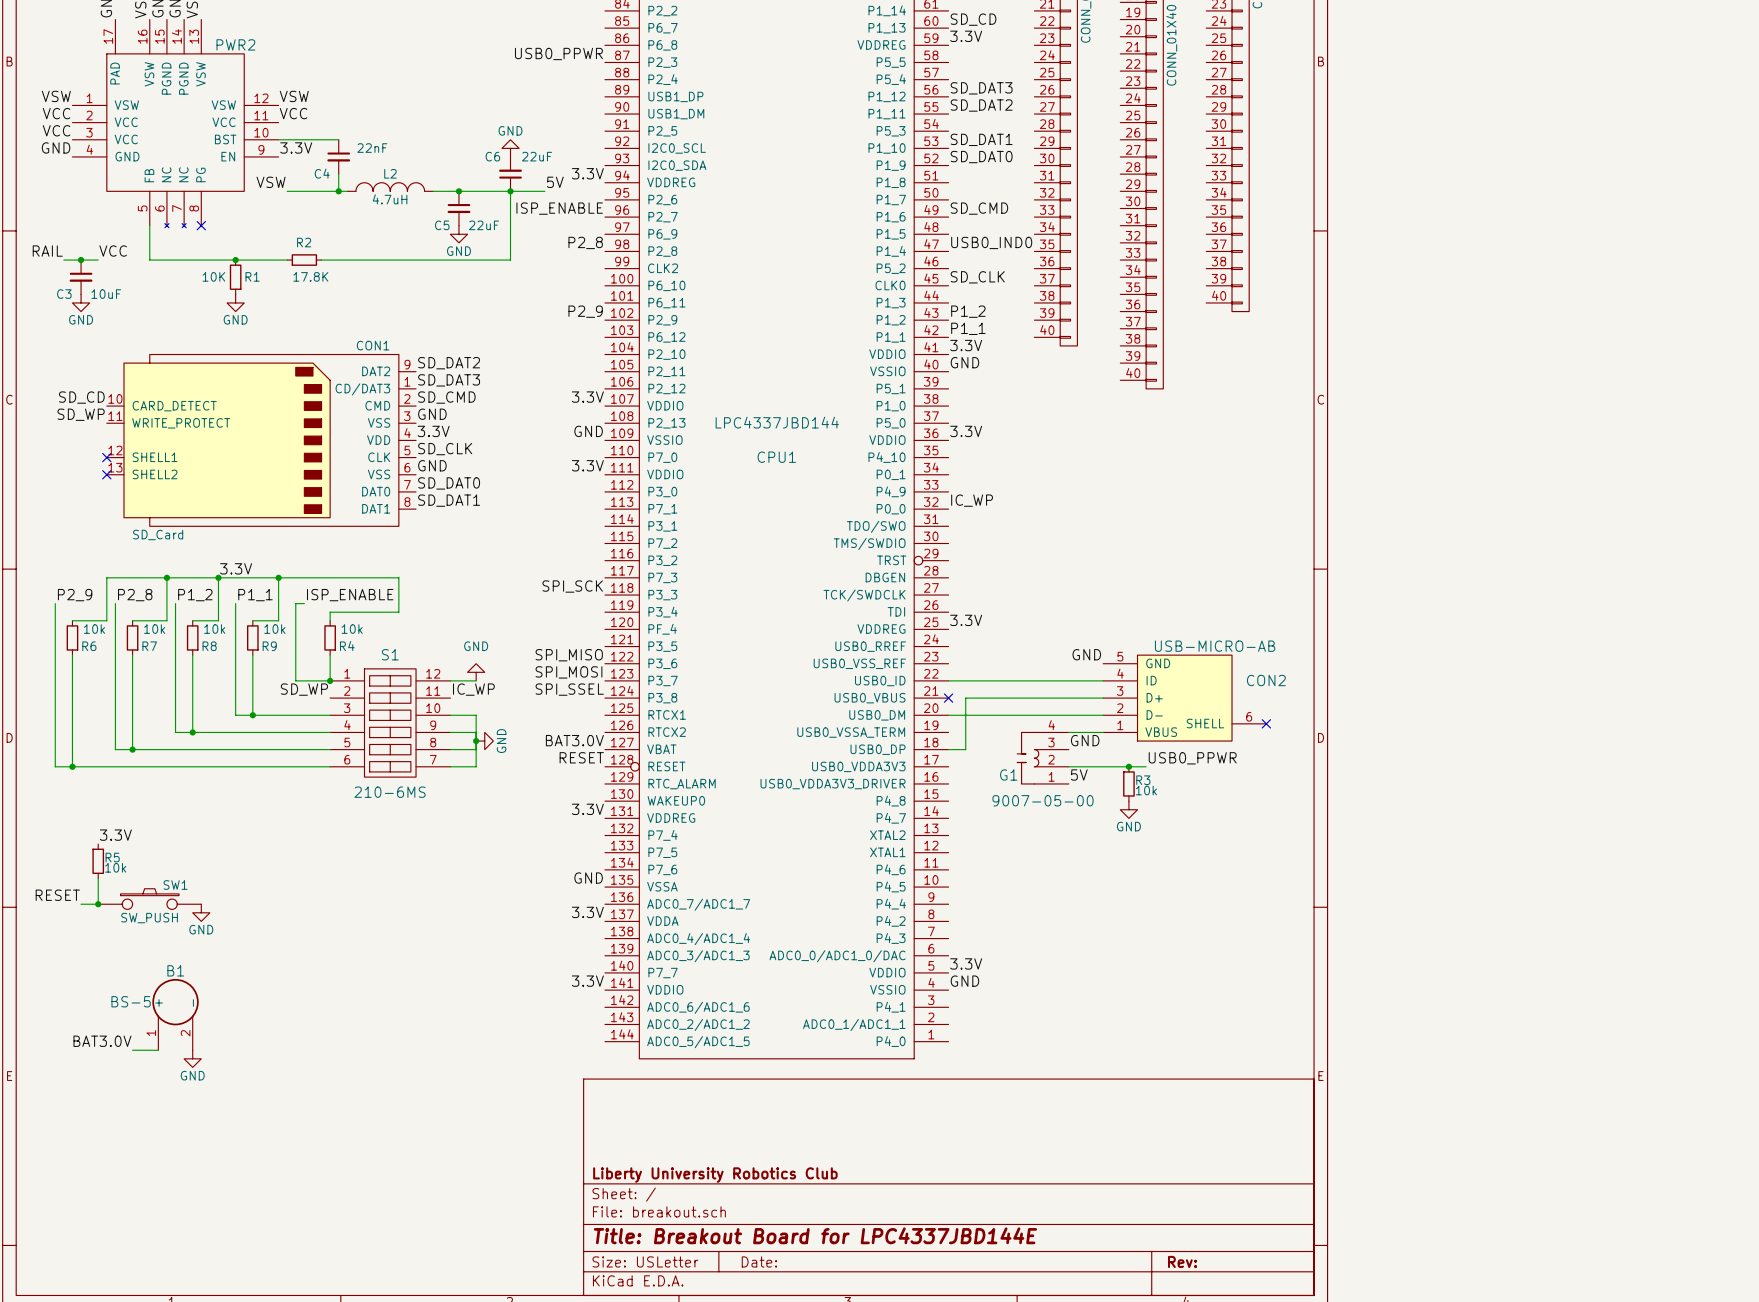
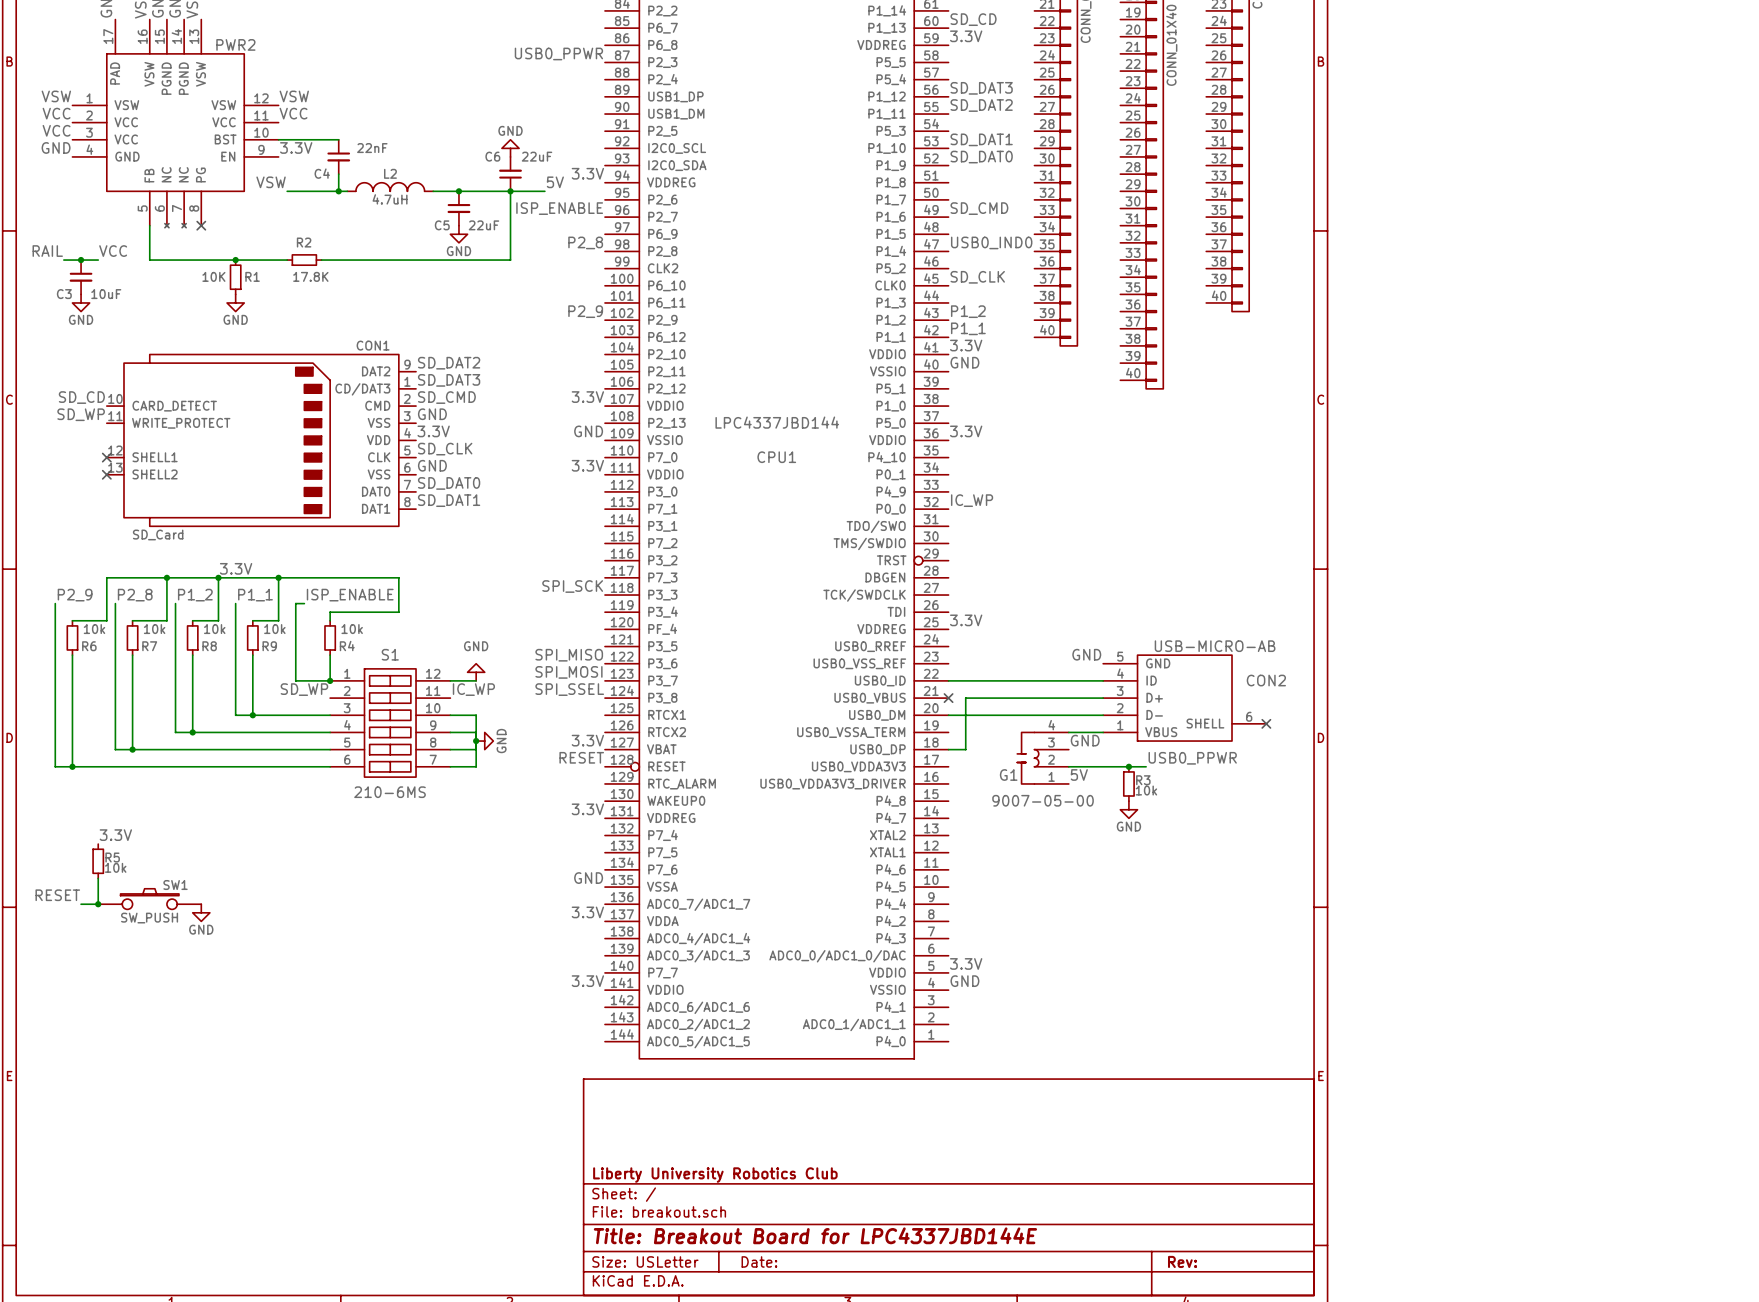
label: BAT3.0V (574, 740) -> 3.3V (587, 740)
B1: BS-5 (175, 1014) -> none
label: BAT3.0V (102, 1041) -> none
wire: (132, 1050) (158, 1050) -> none
power symbol: GND (192, 1058) -> none

